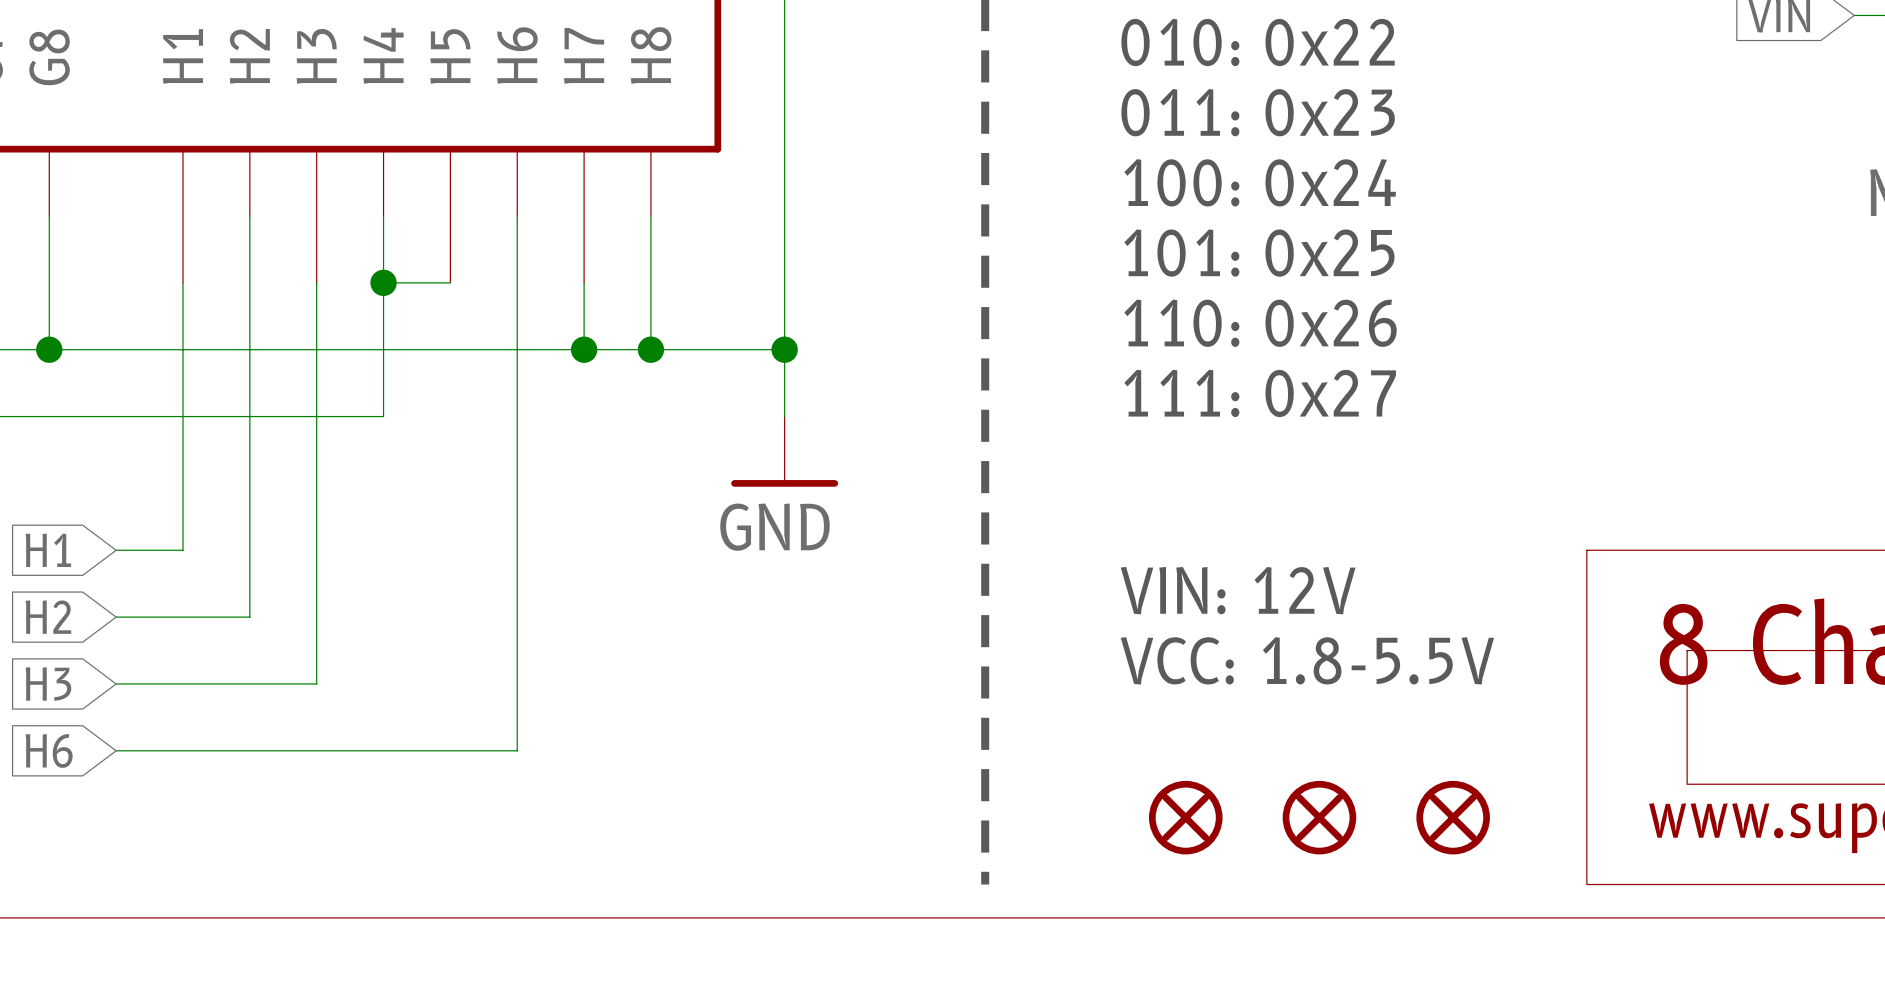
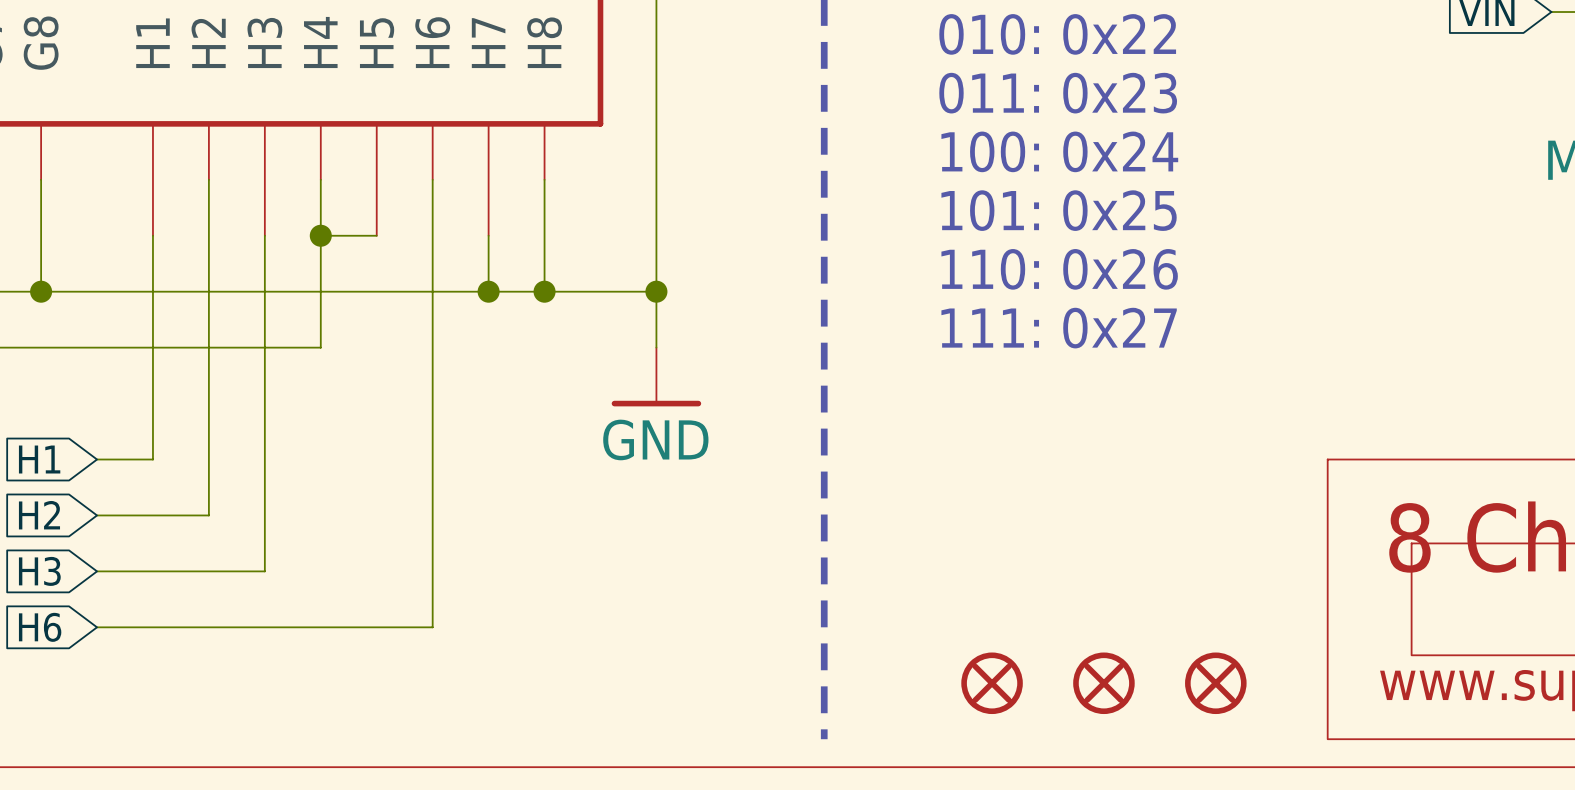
text: VIN: 12V (1238, 590) -> none
text: VCC: 1.8-5.5V (1307, 660) -> none

